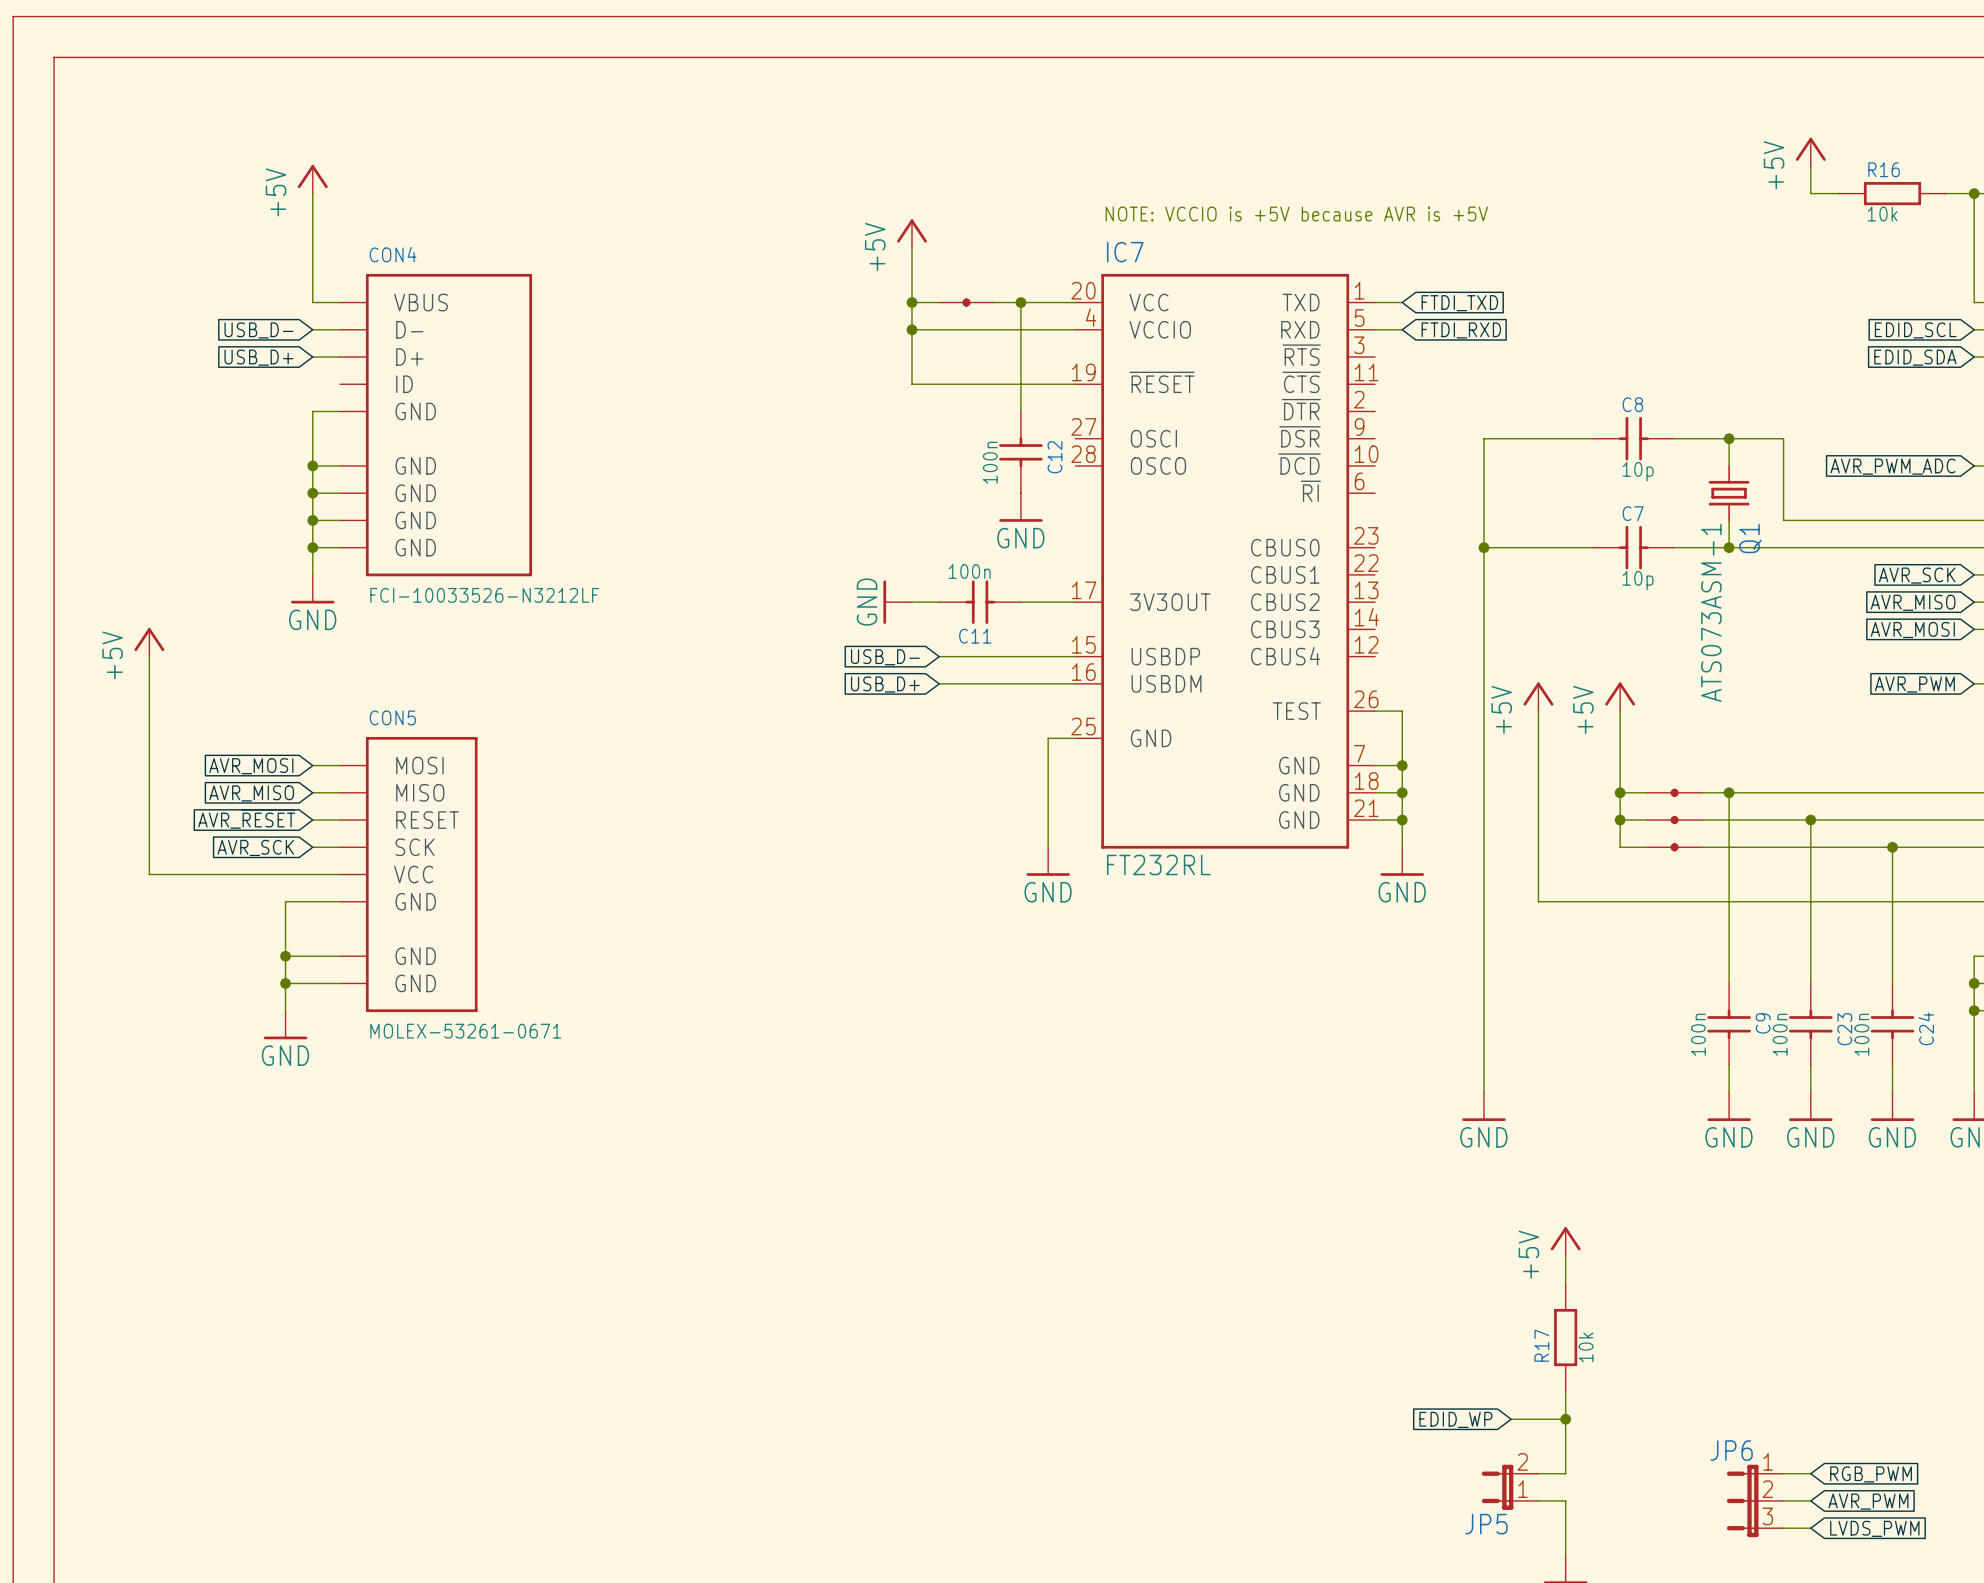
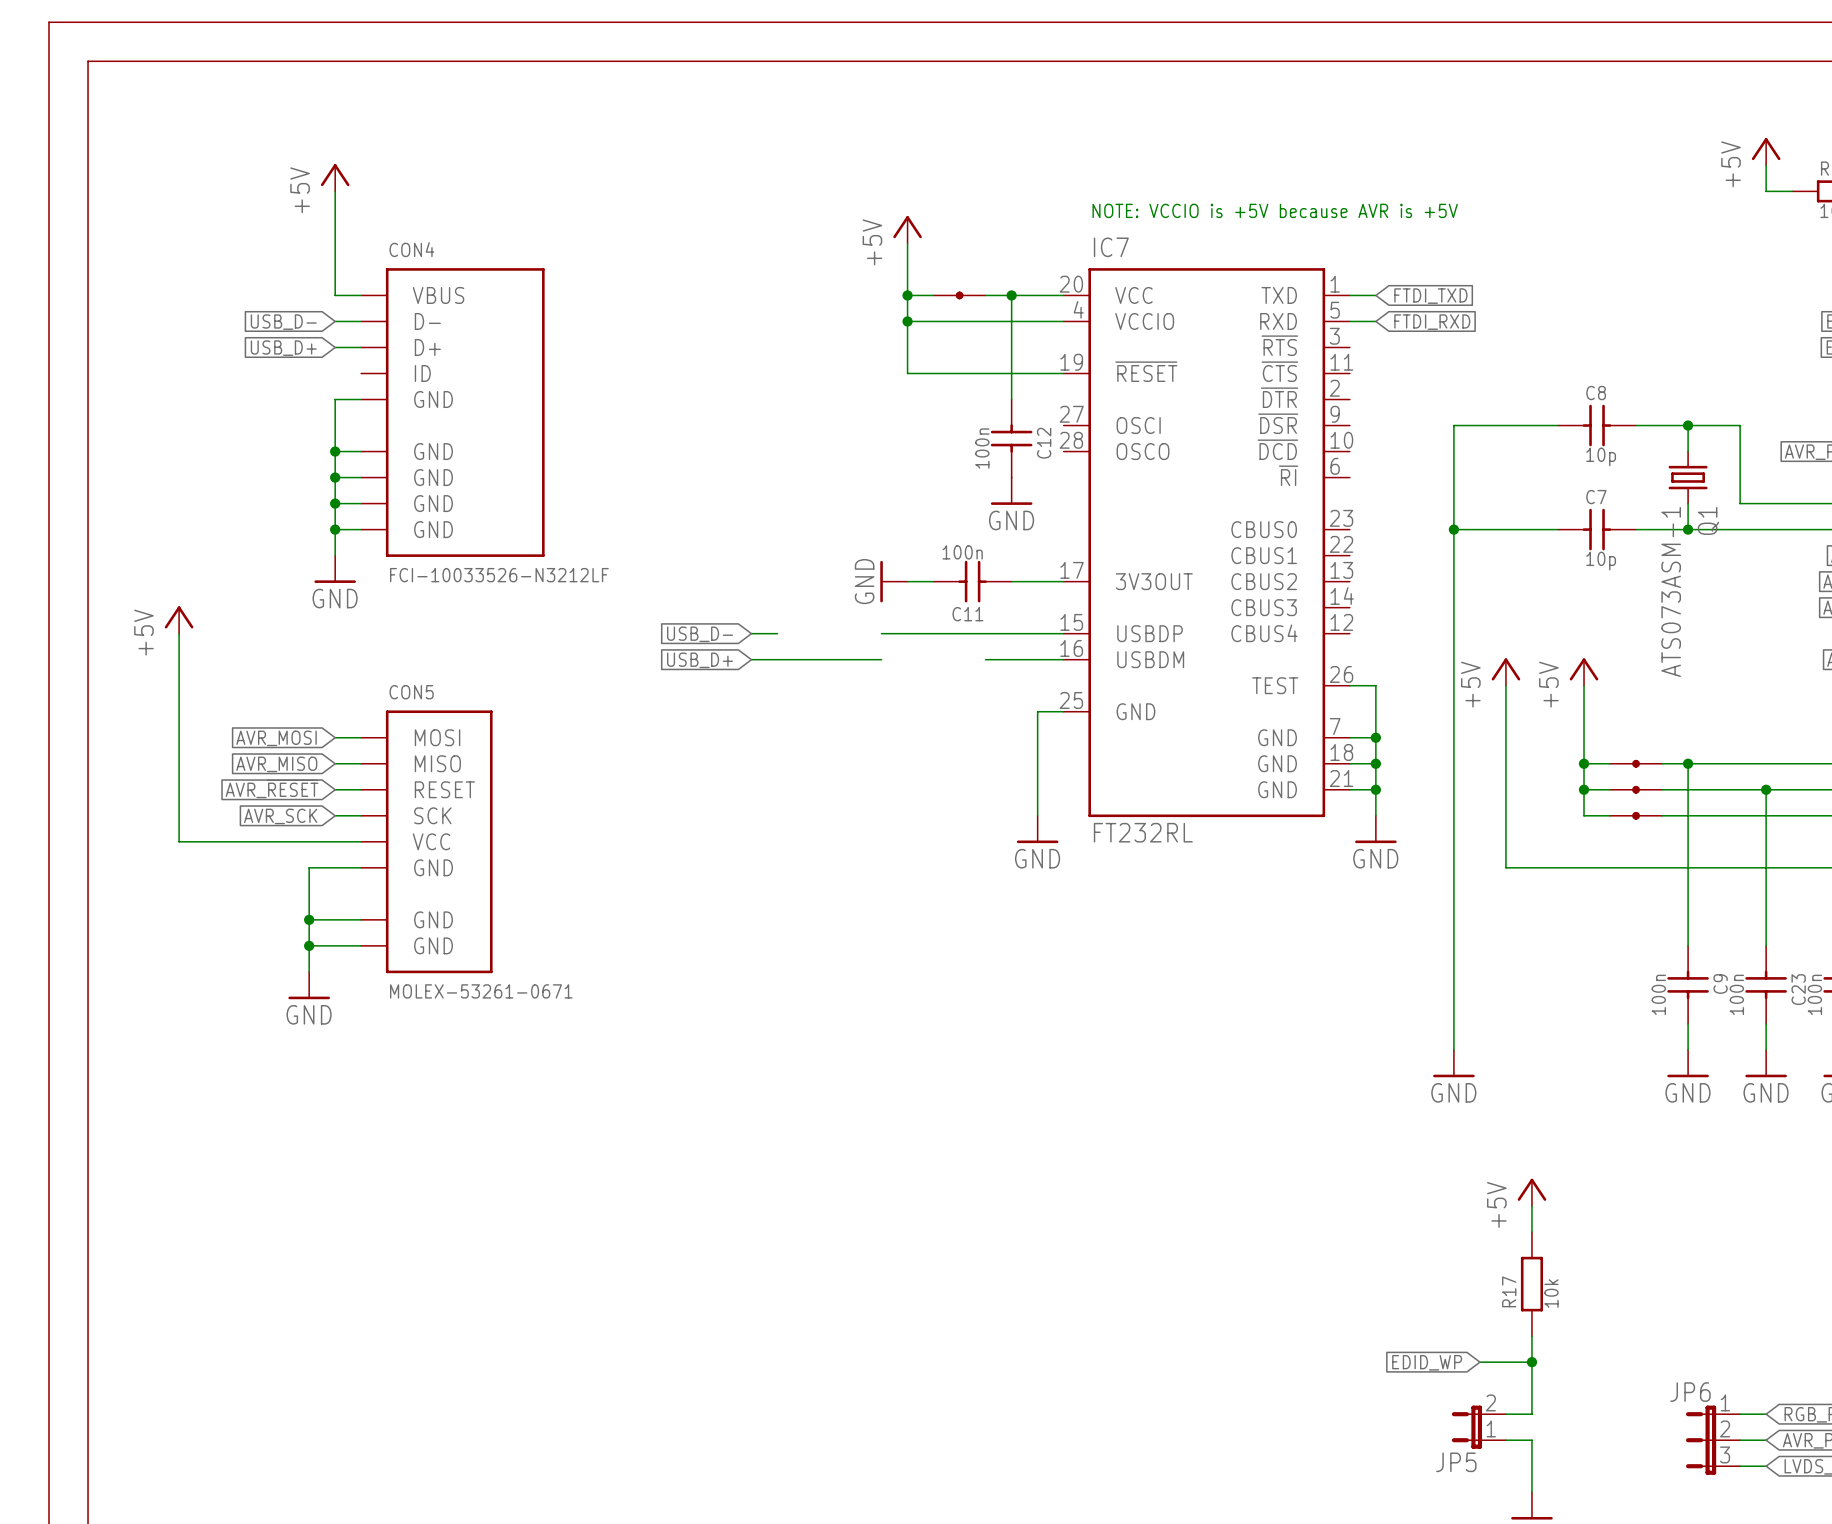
wire: none -> (751, 633) (777, 633)
global label position: USB_D- (885, 657) -> USB_D- (700, 634)
wire: none -> (751, 659) (881, 659)
wire: (939, 683) (993, 683) -> (881, 633) (933, 633)
global label position: USB_D+ (885, 684) -> USB_D+ (700, 660)

